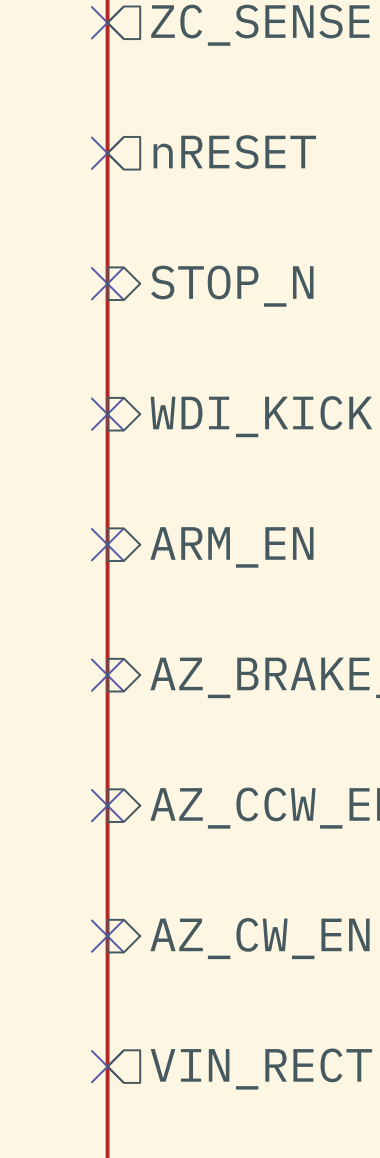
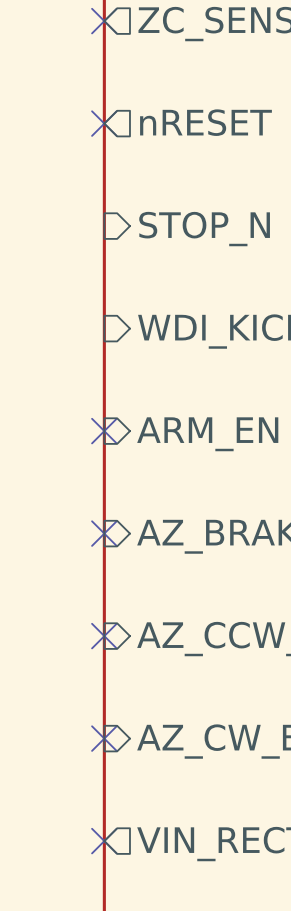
no-connect mark: (107, 283) -> none
no-connect mark: (107, 414) -> none

